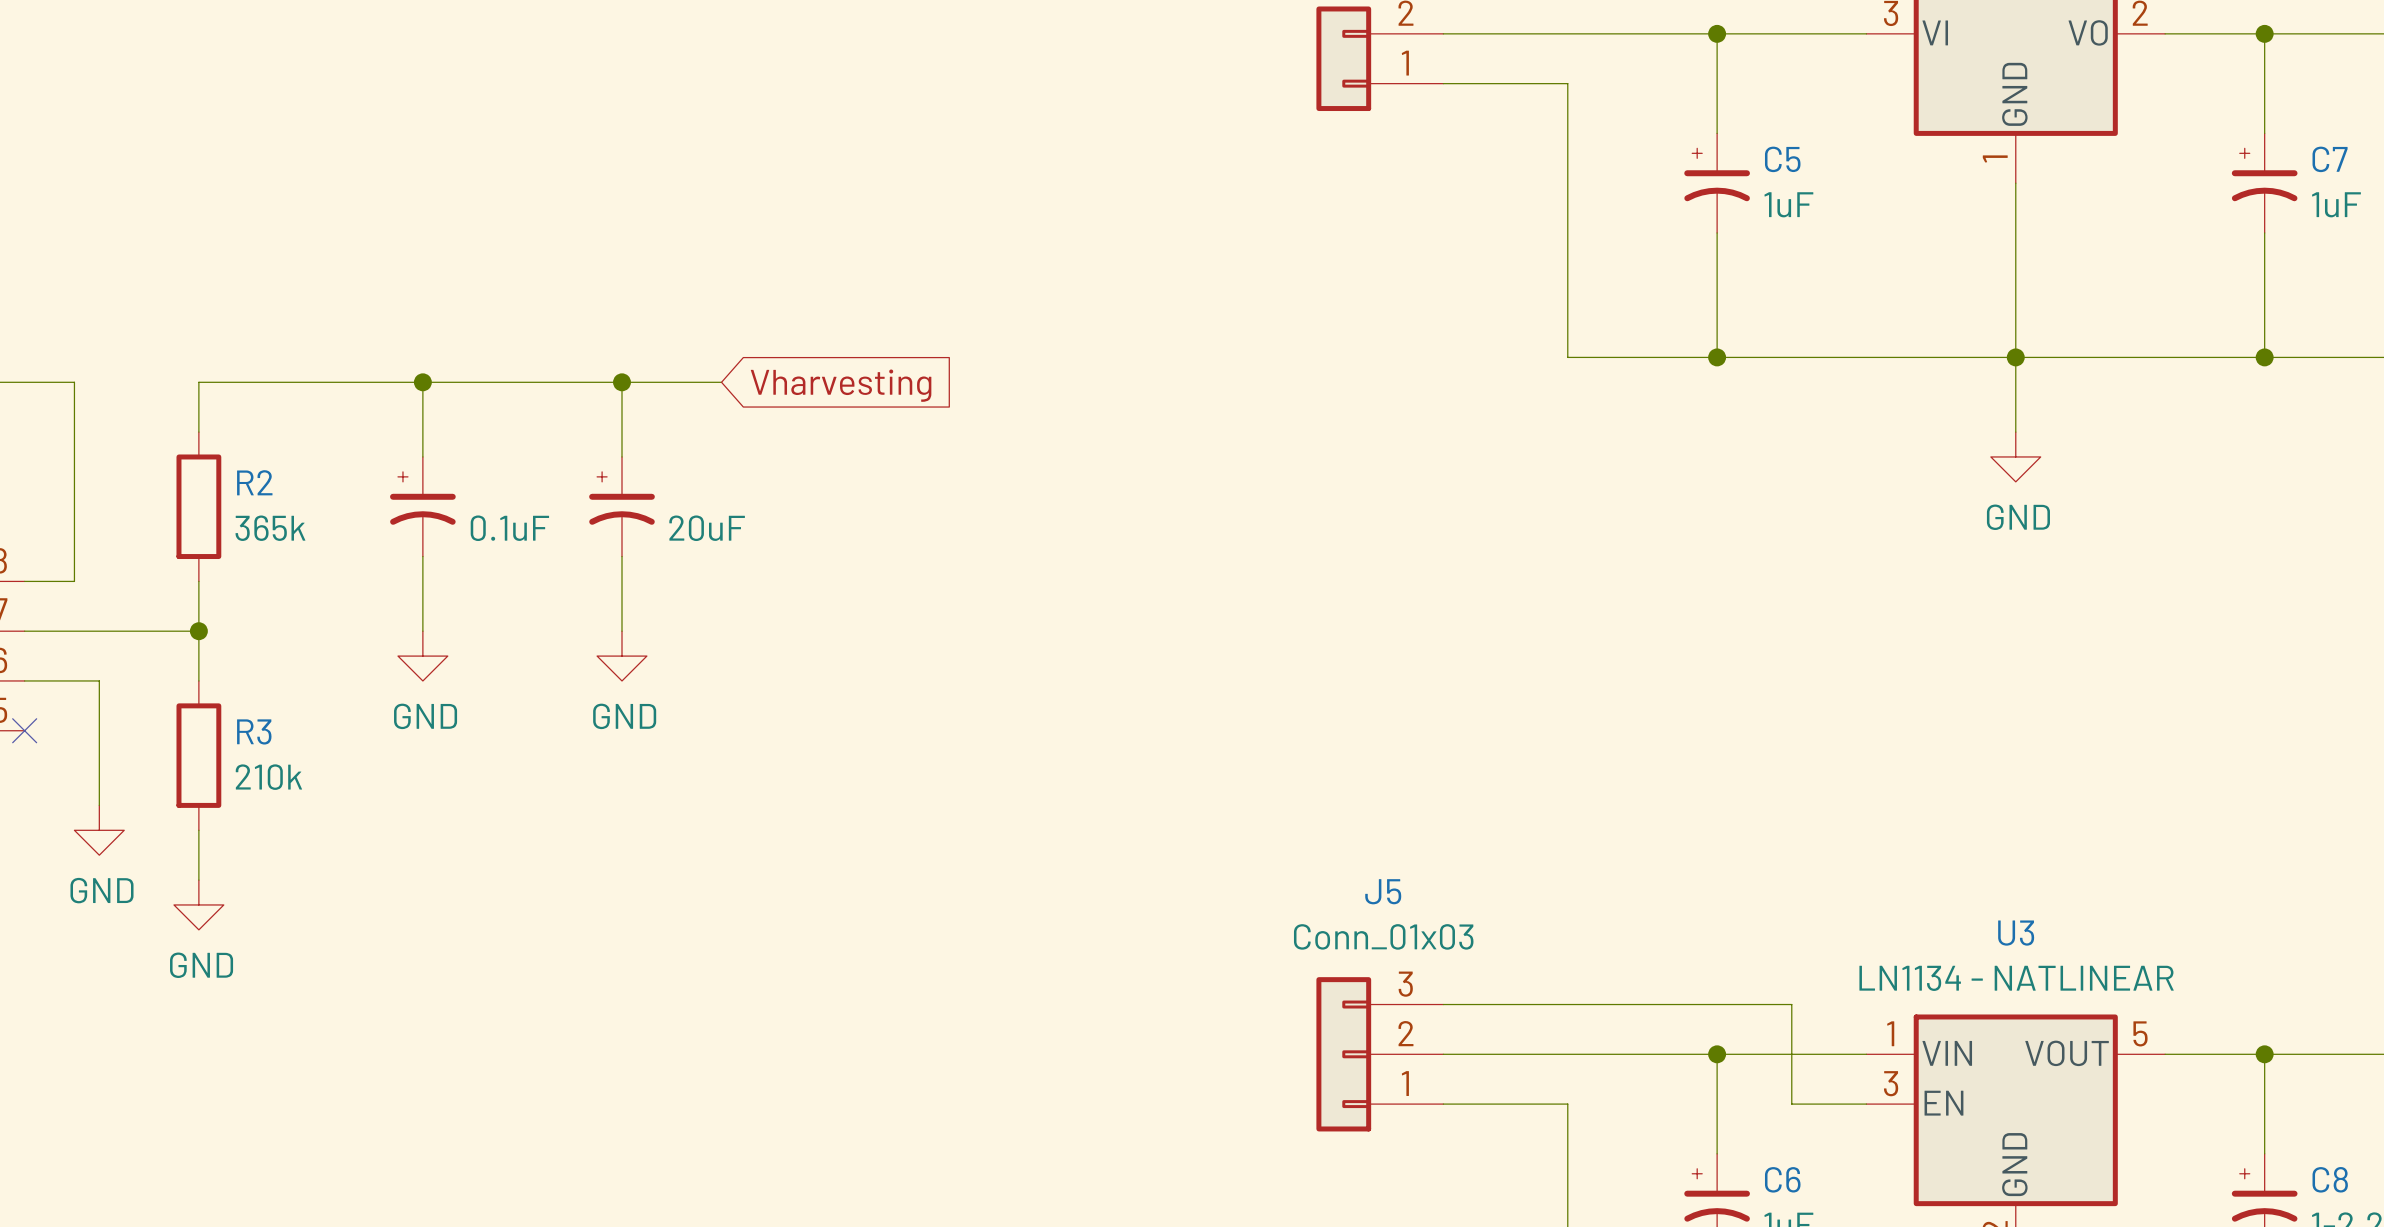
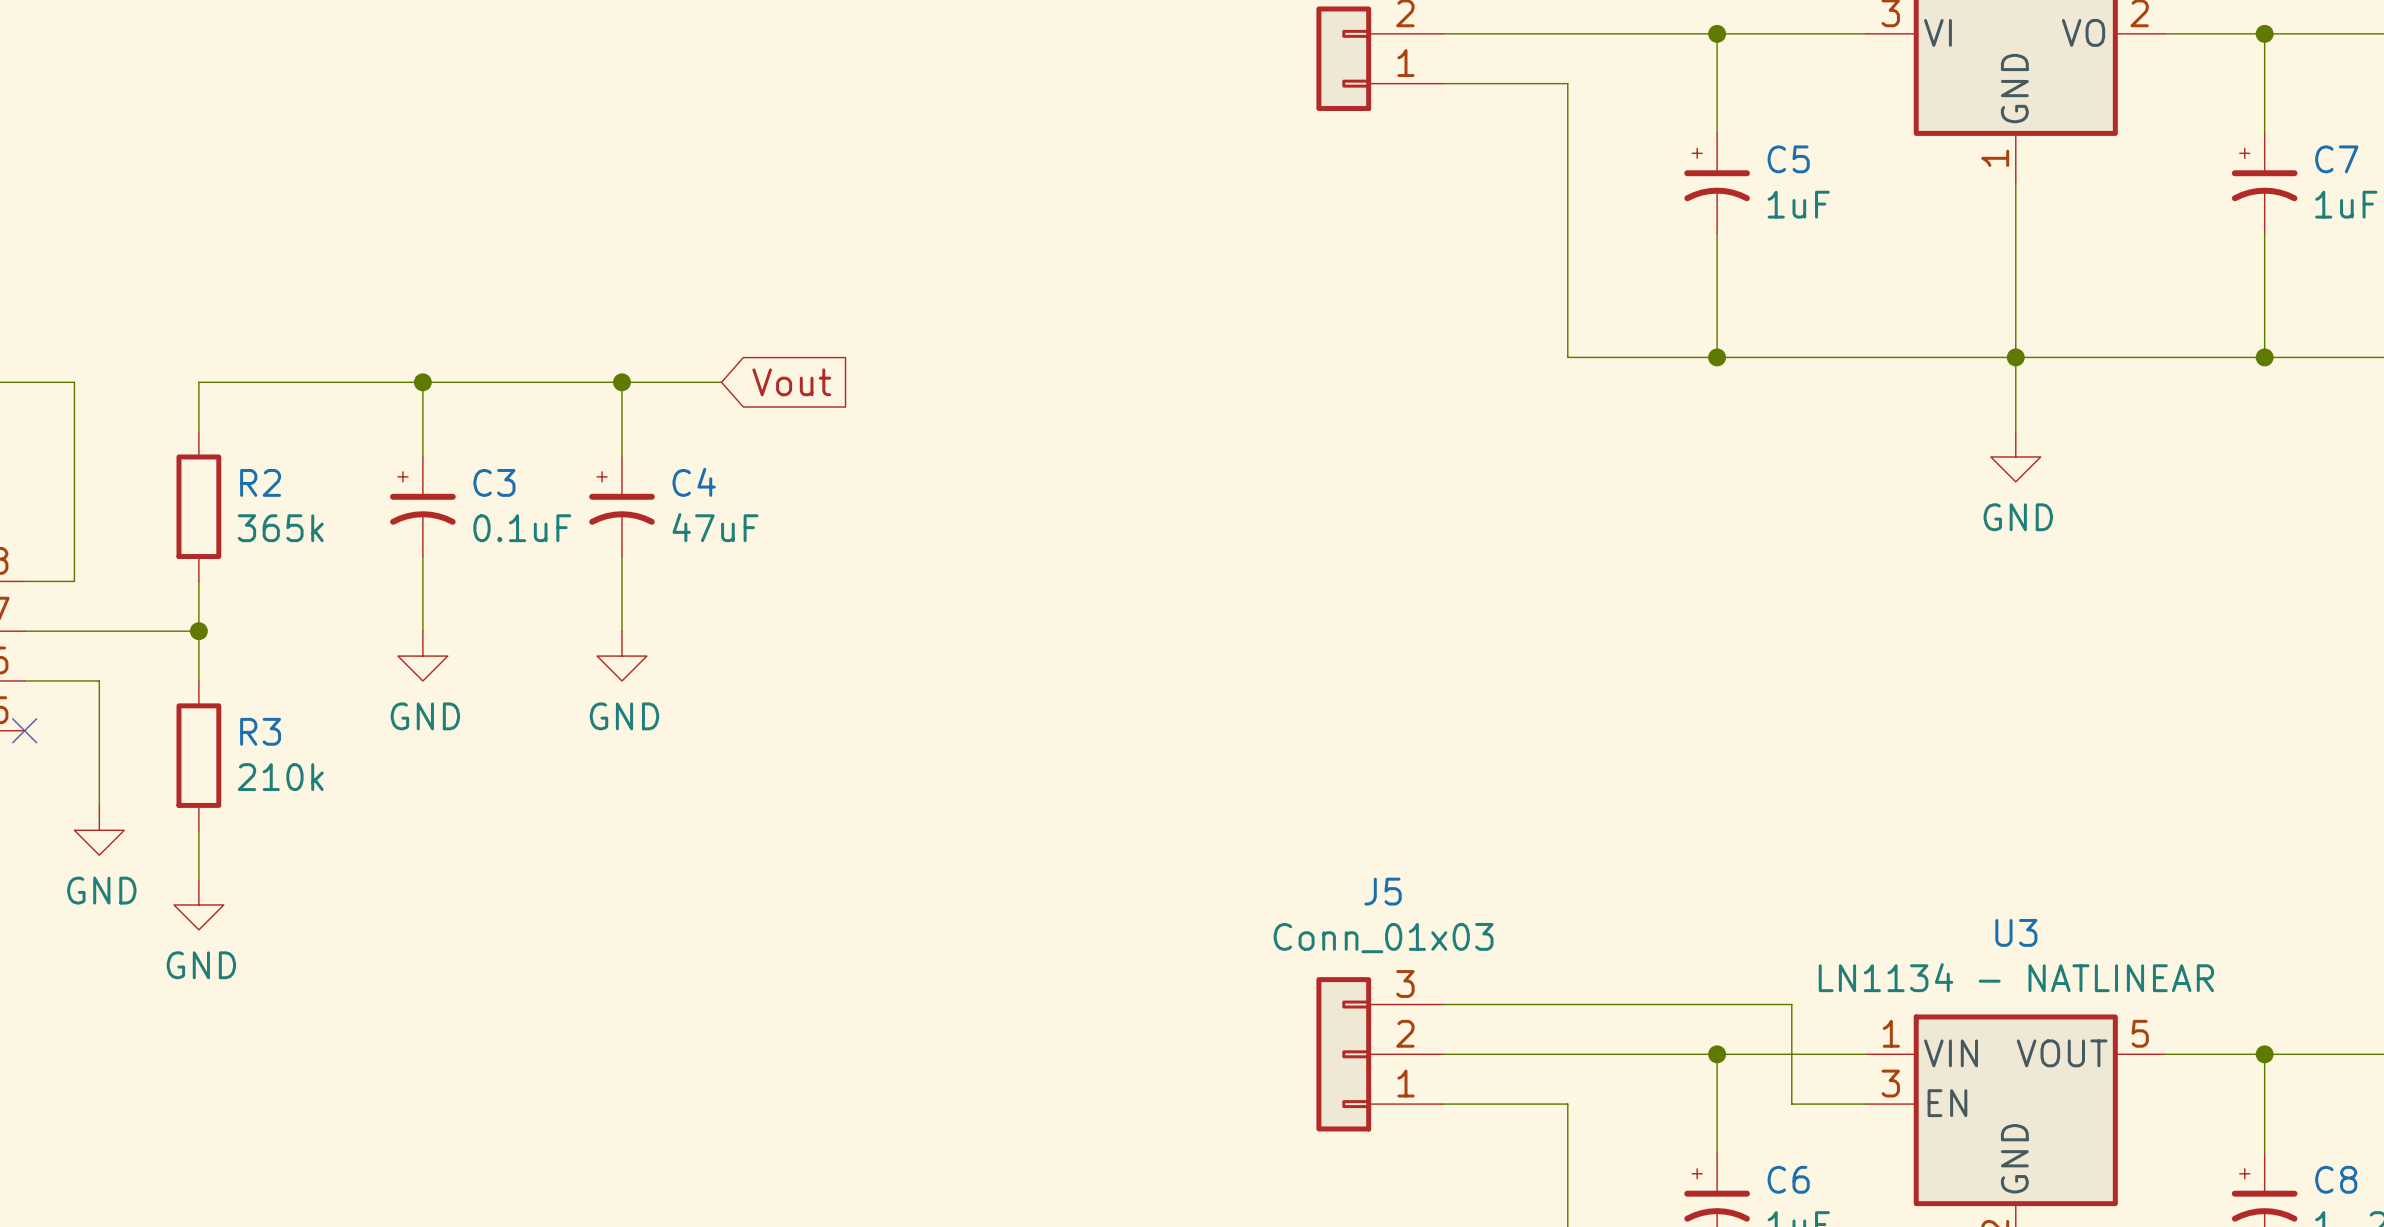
global label: Vharvesting (841, 385) -> Vout (791, 382)
C3 name: none -> C3 (494, 482)
C4 name: none -> C4 (694, 482)
C4 value: 20uF (707, 528) -> 47uF (715, 527)

